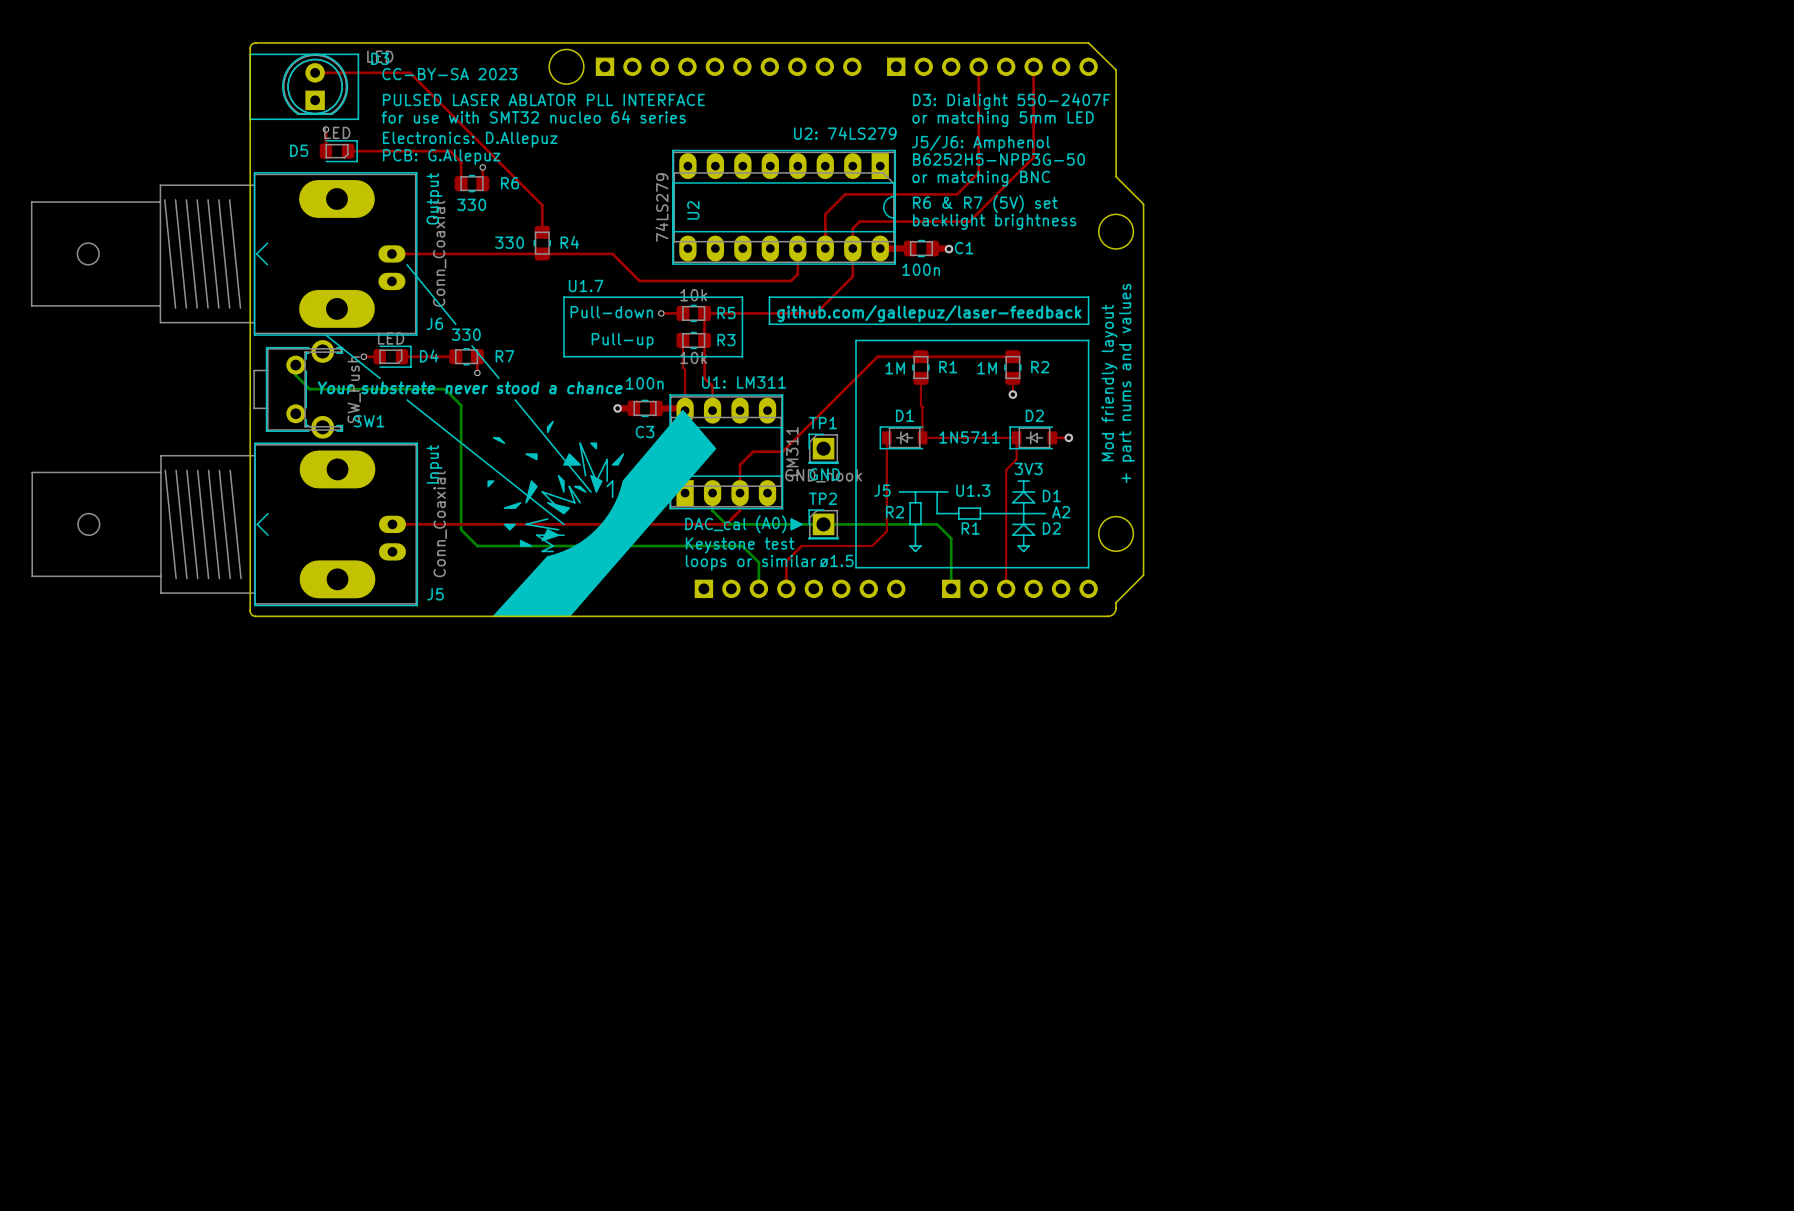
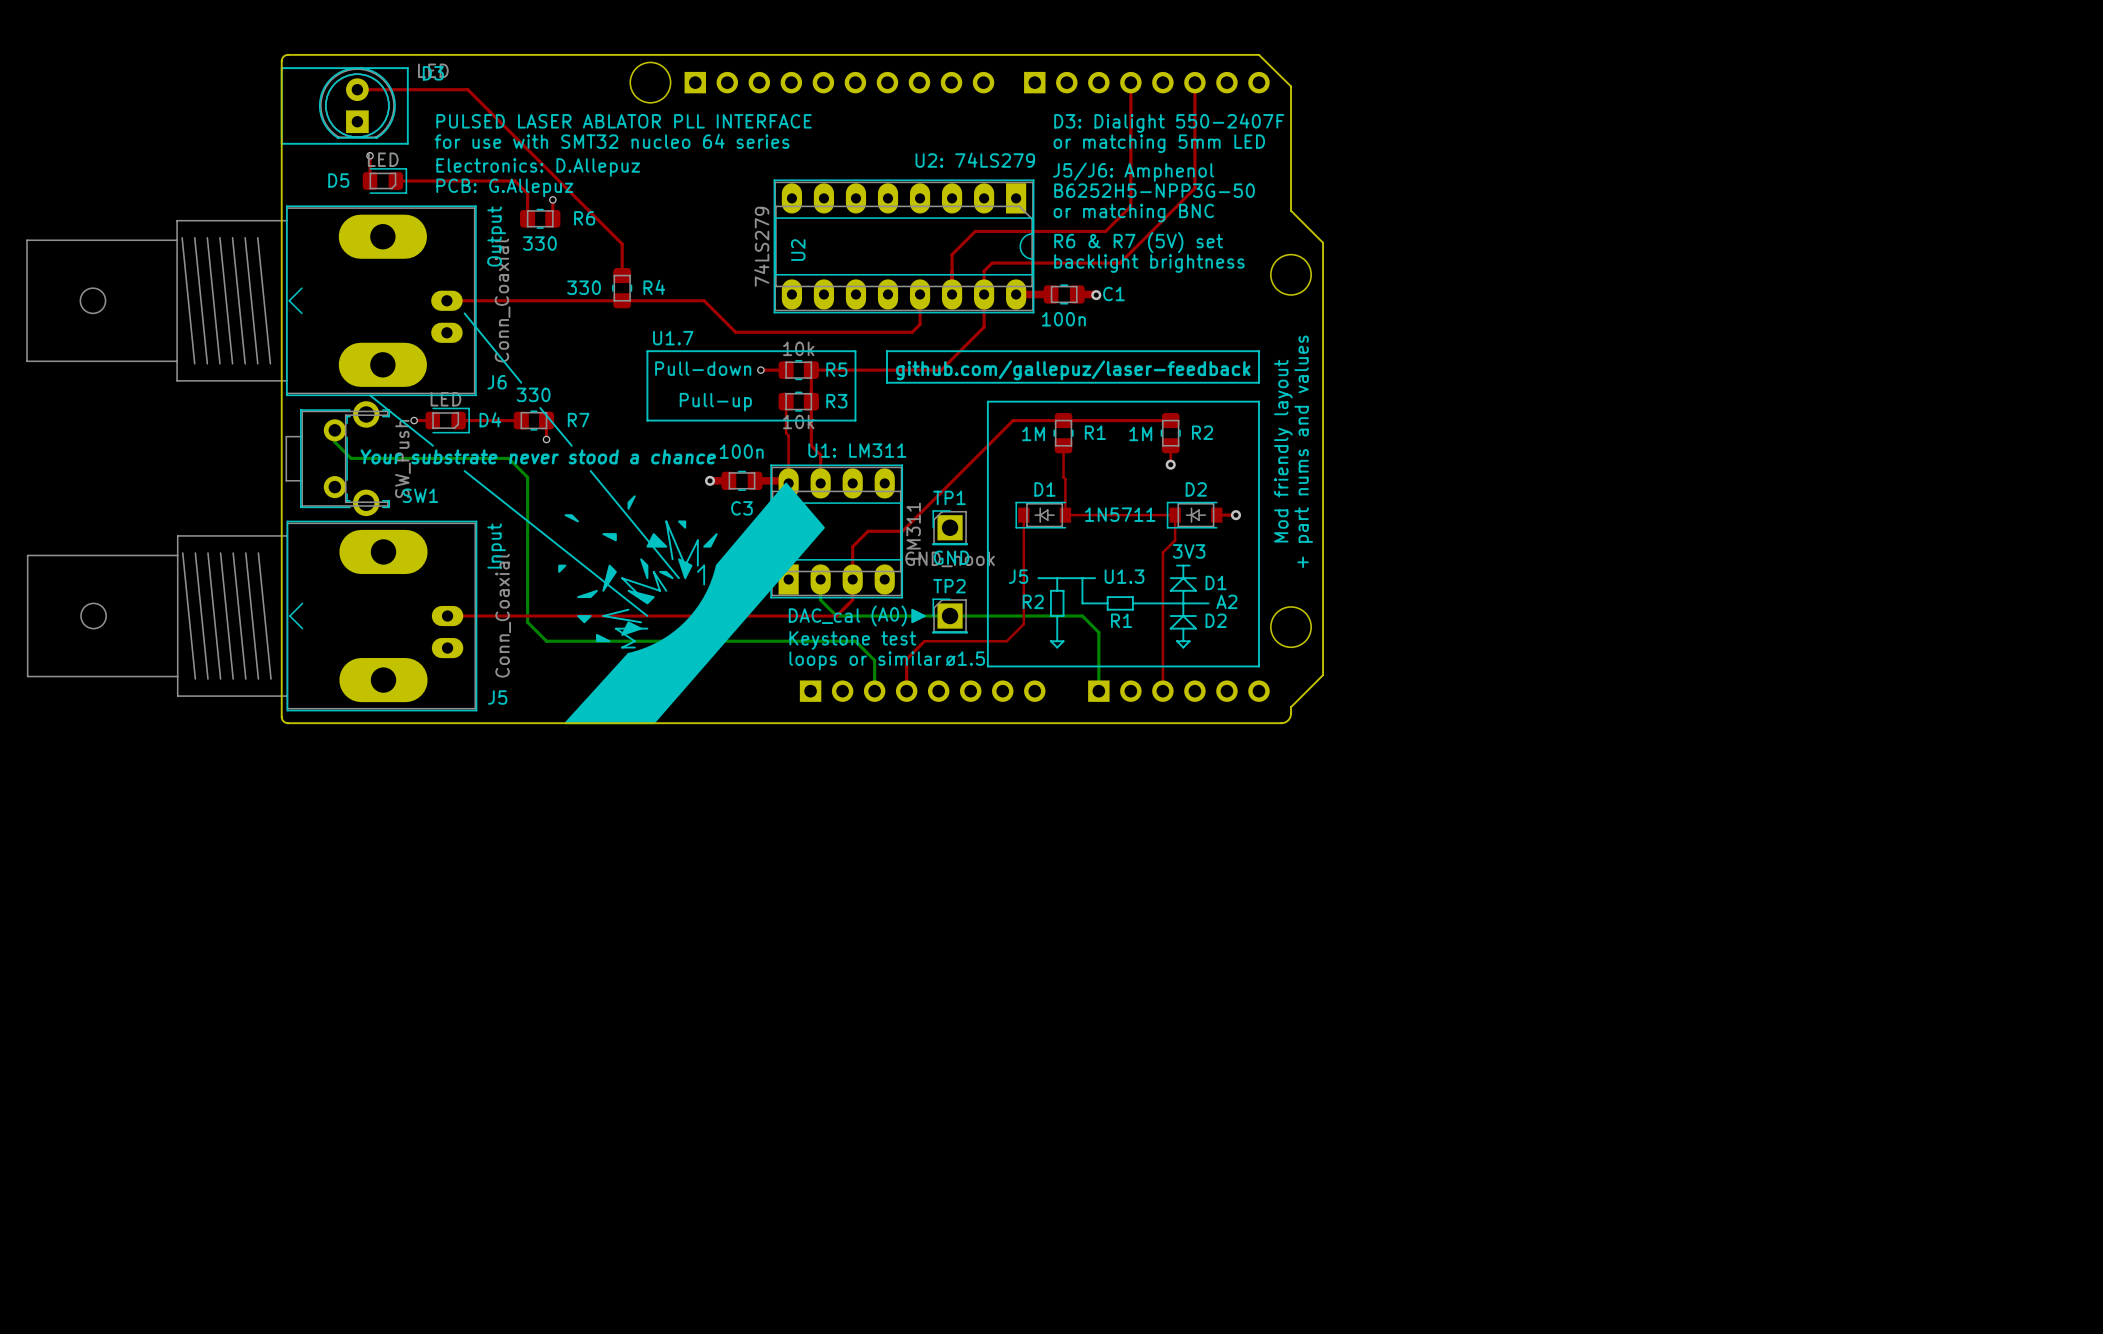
text: CC-BY-SA 2023 (449, 74) -> none

